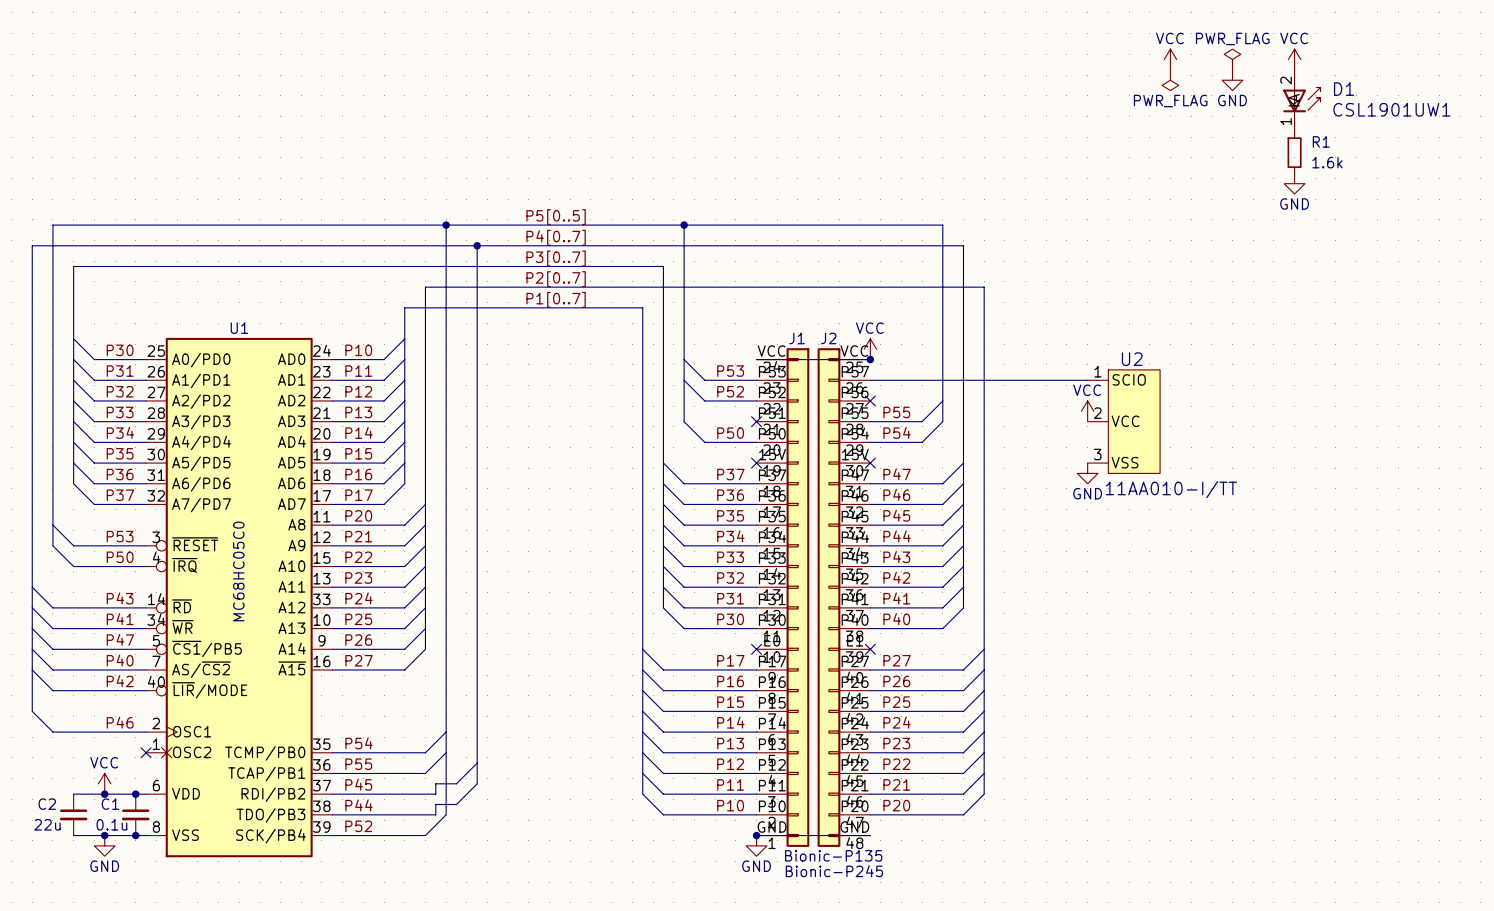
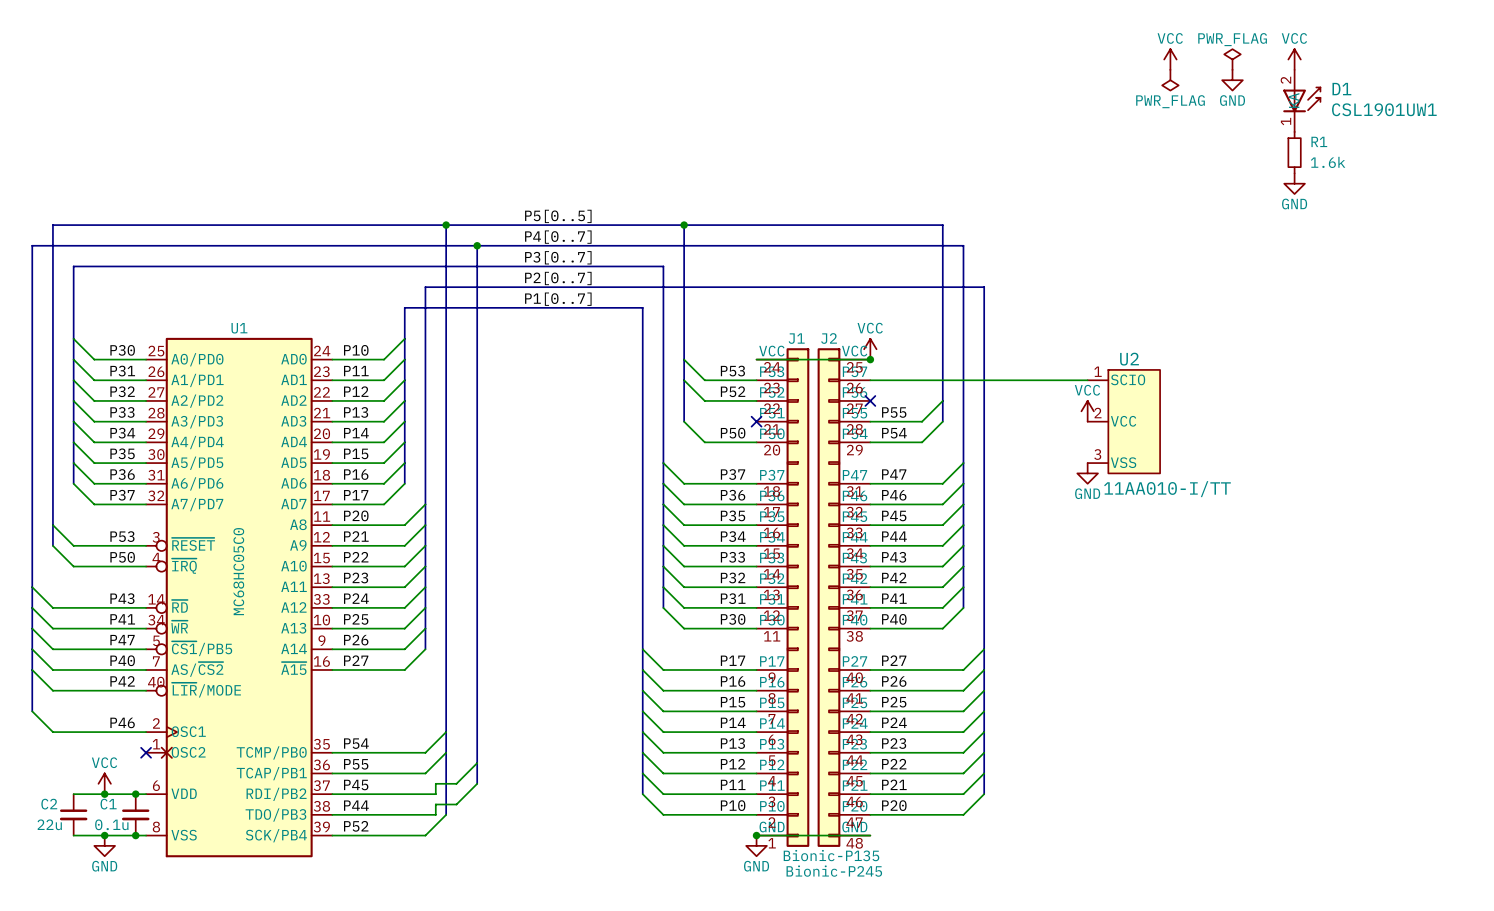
J1 symbol: [756, 348, 810, 847] -> [756, 348, 810, 847]
J2 symbol: [817, 348, 871, 847] -> [817, 348, 871, 847]
no-connect mark: (756, 463) -> none
no-connect mark: (870, 463) -> none
no-connect mark: (756, 649) -> none
no-connect mark: (870, 649) -> none

